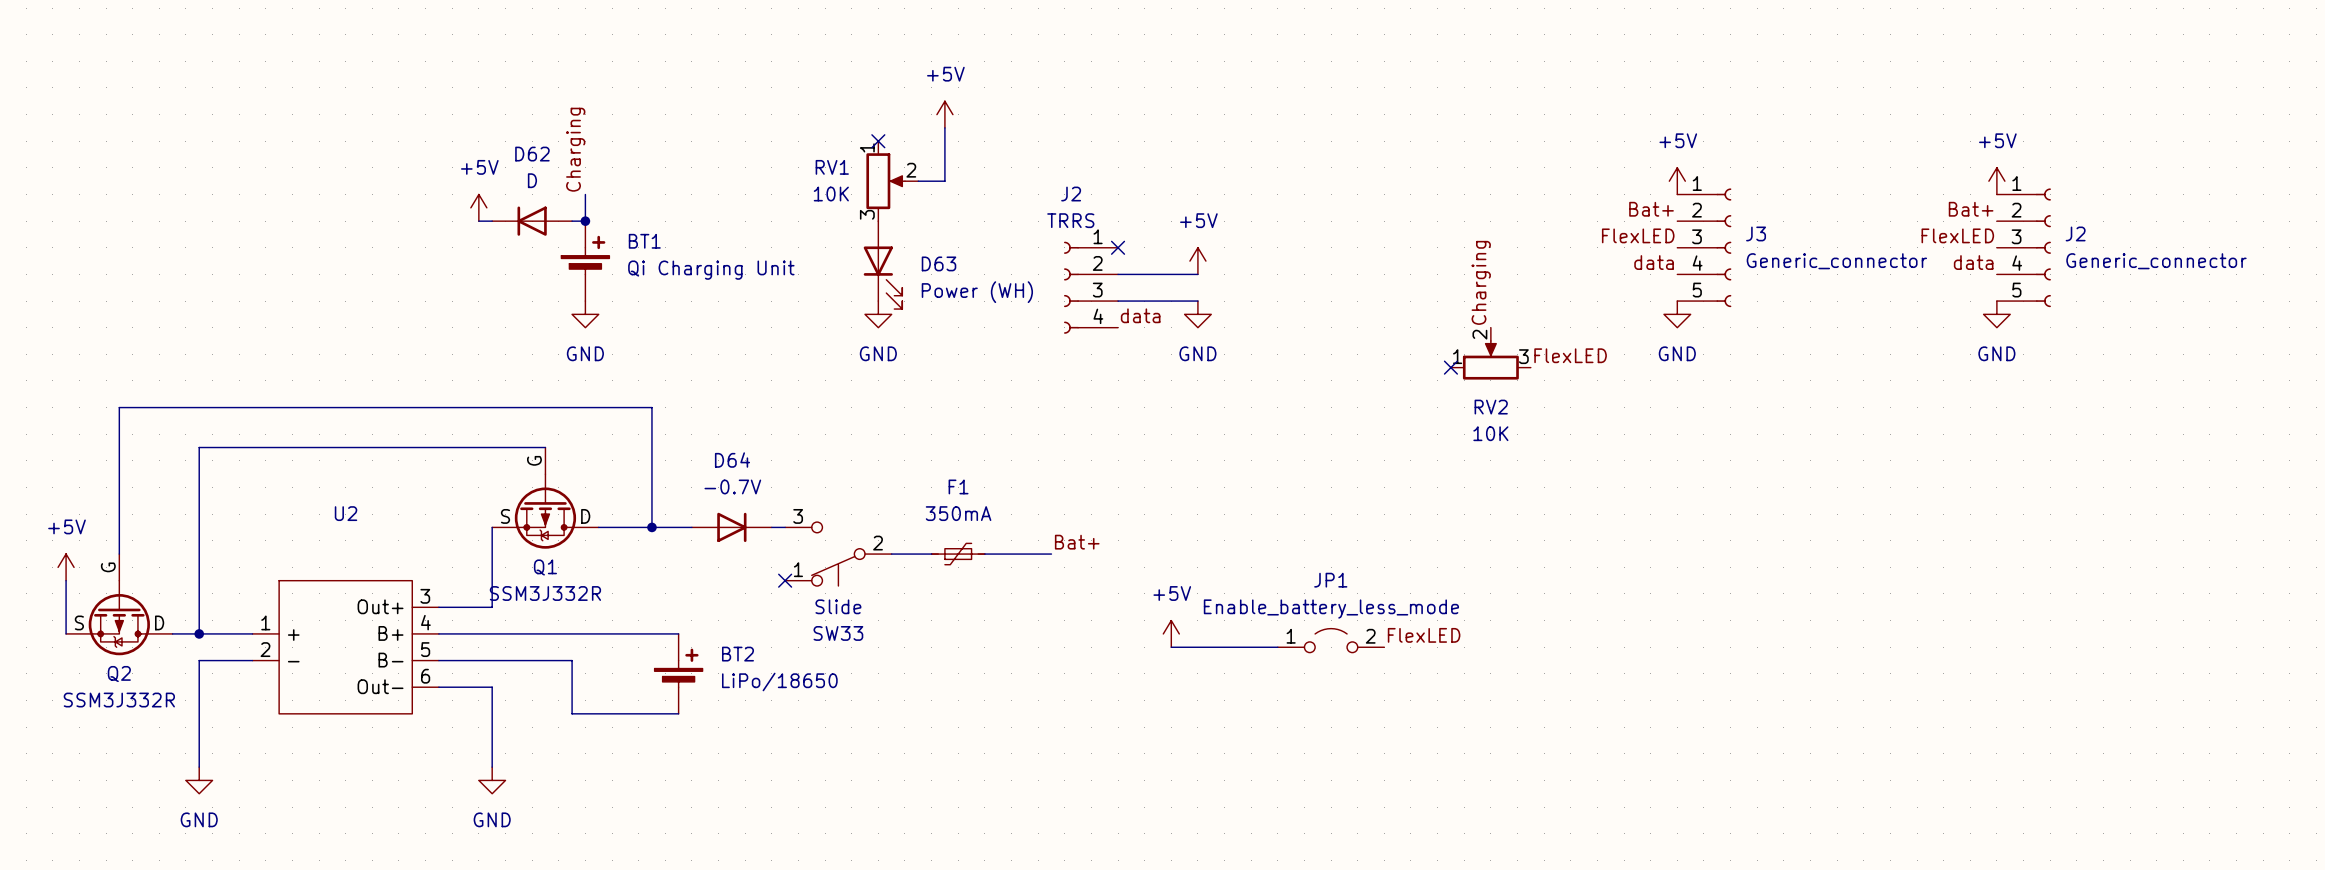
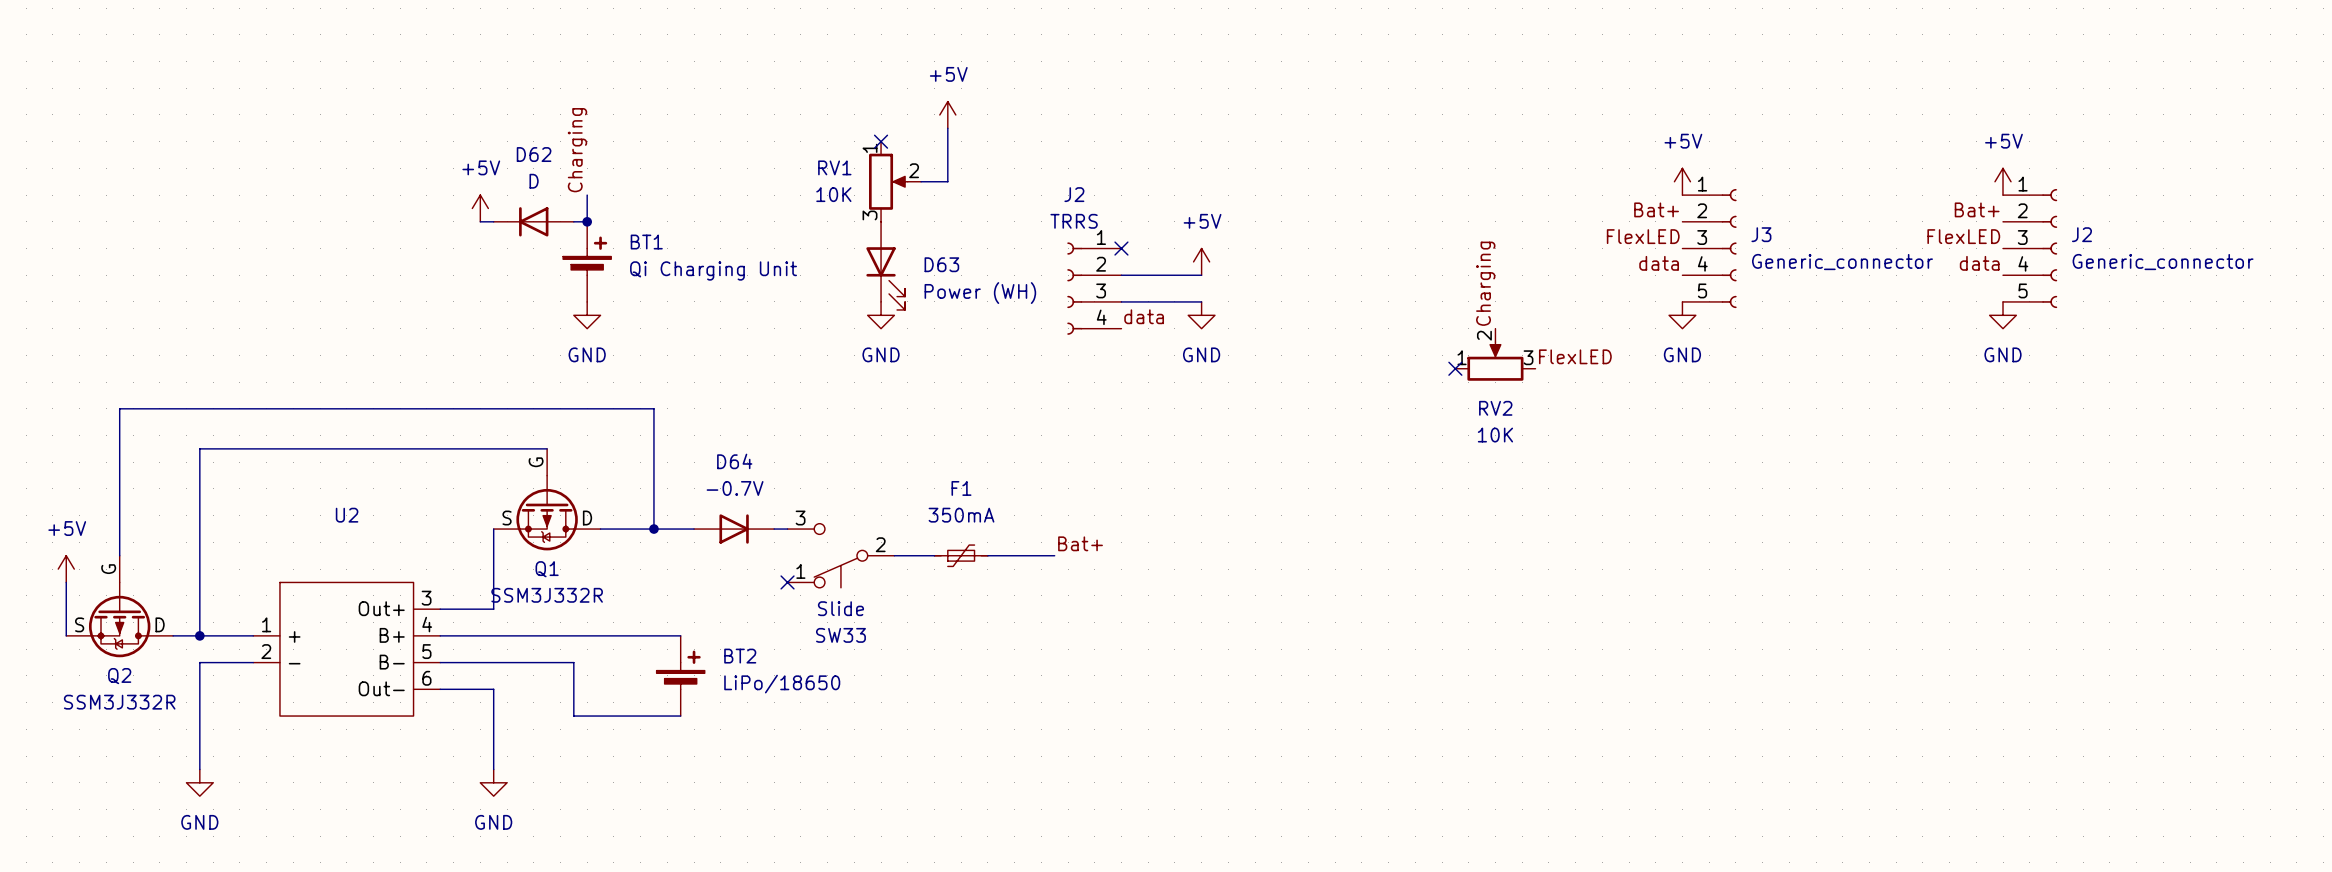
power symbol: +5V (1171, 633) -> none
label: FlexLED (1424, 635) -> none
JP1: Enable_battery_less_mode (1331, 640) -> none
wire: (1171, 647) (1277, 647) -> none

